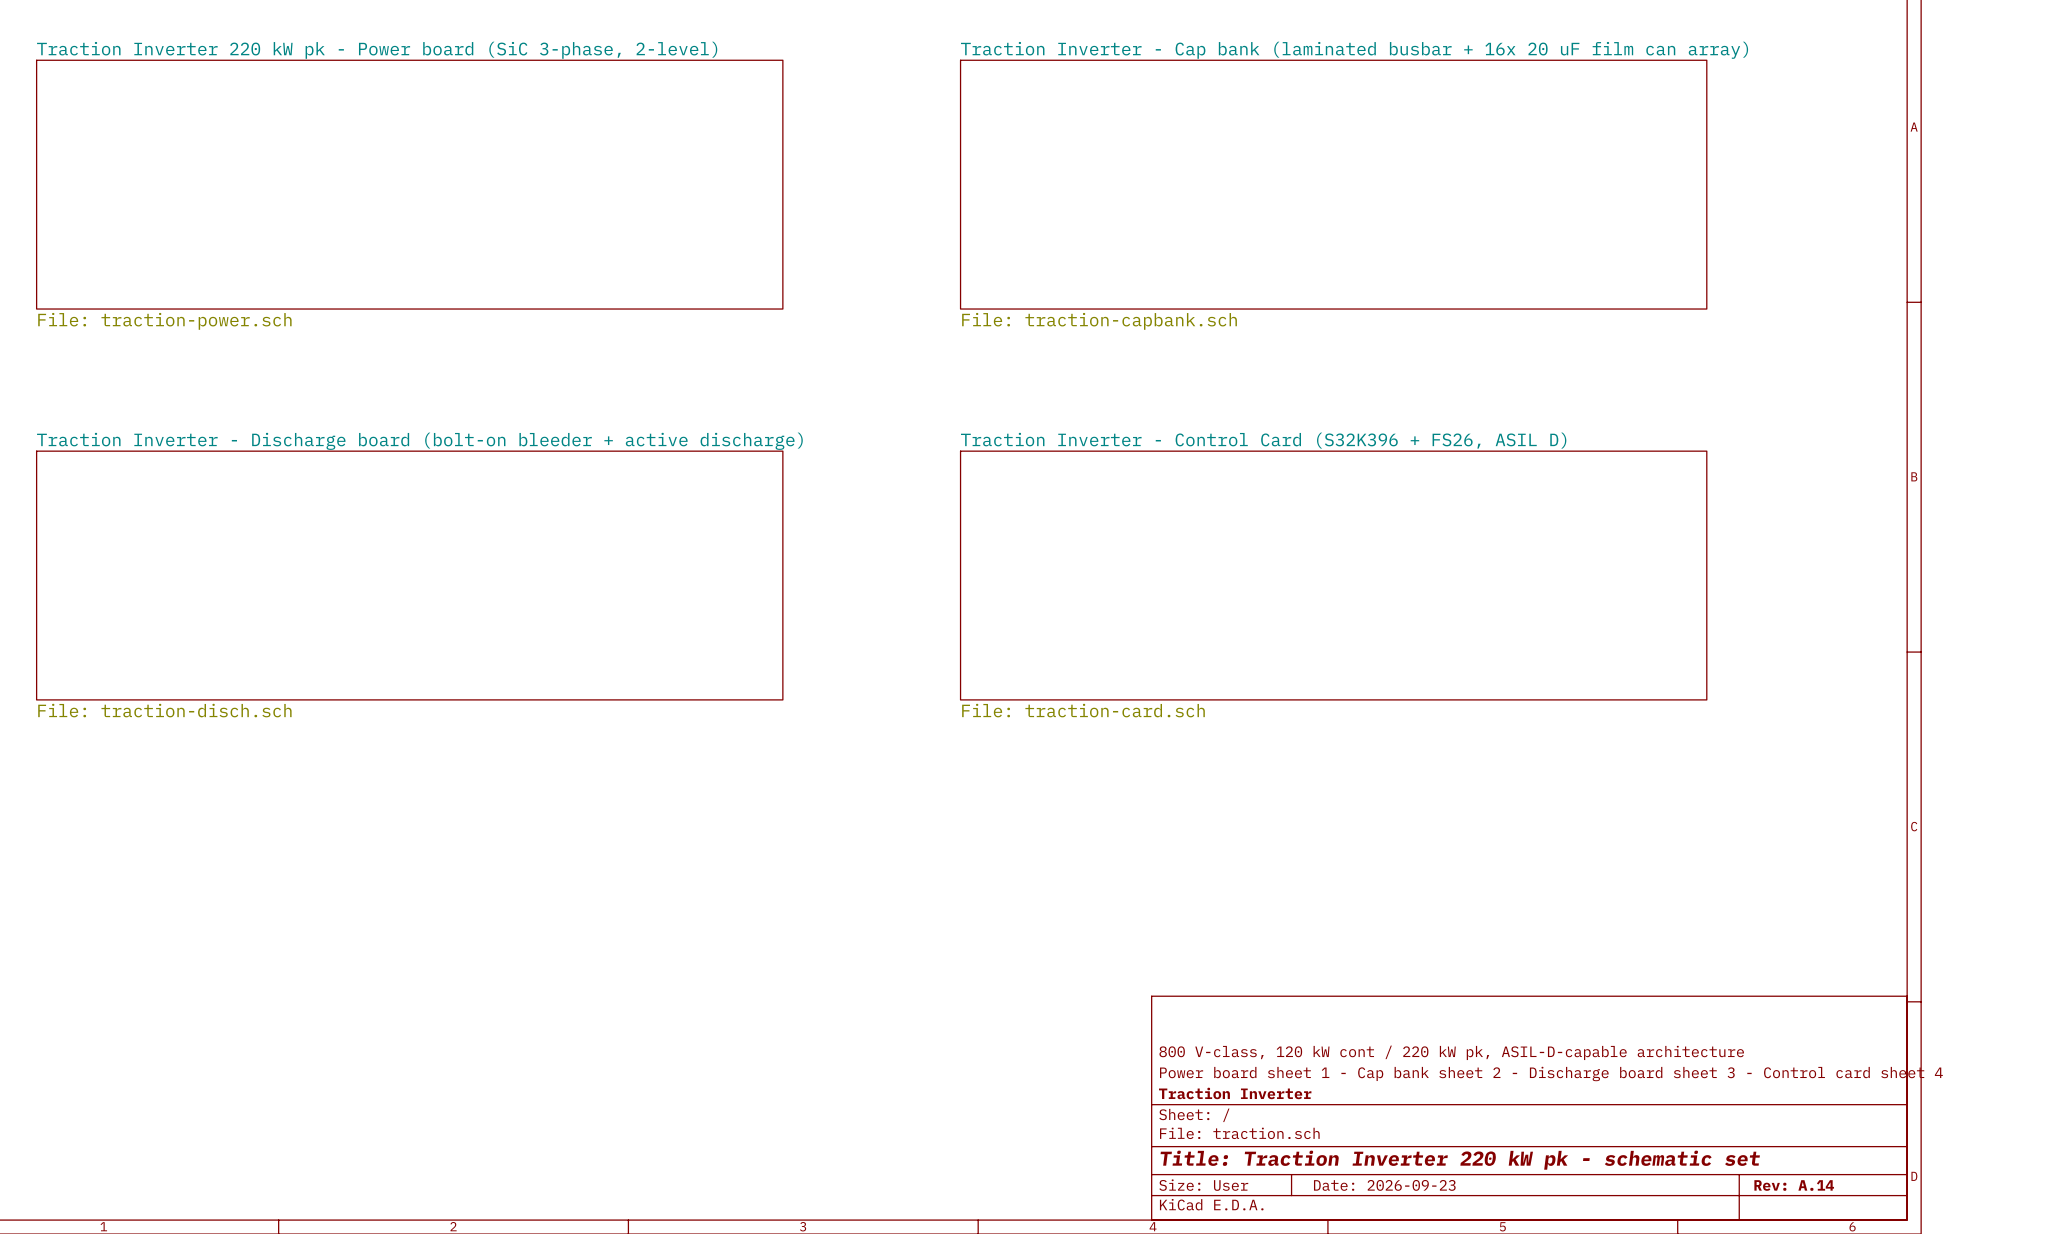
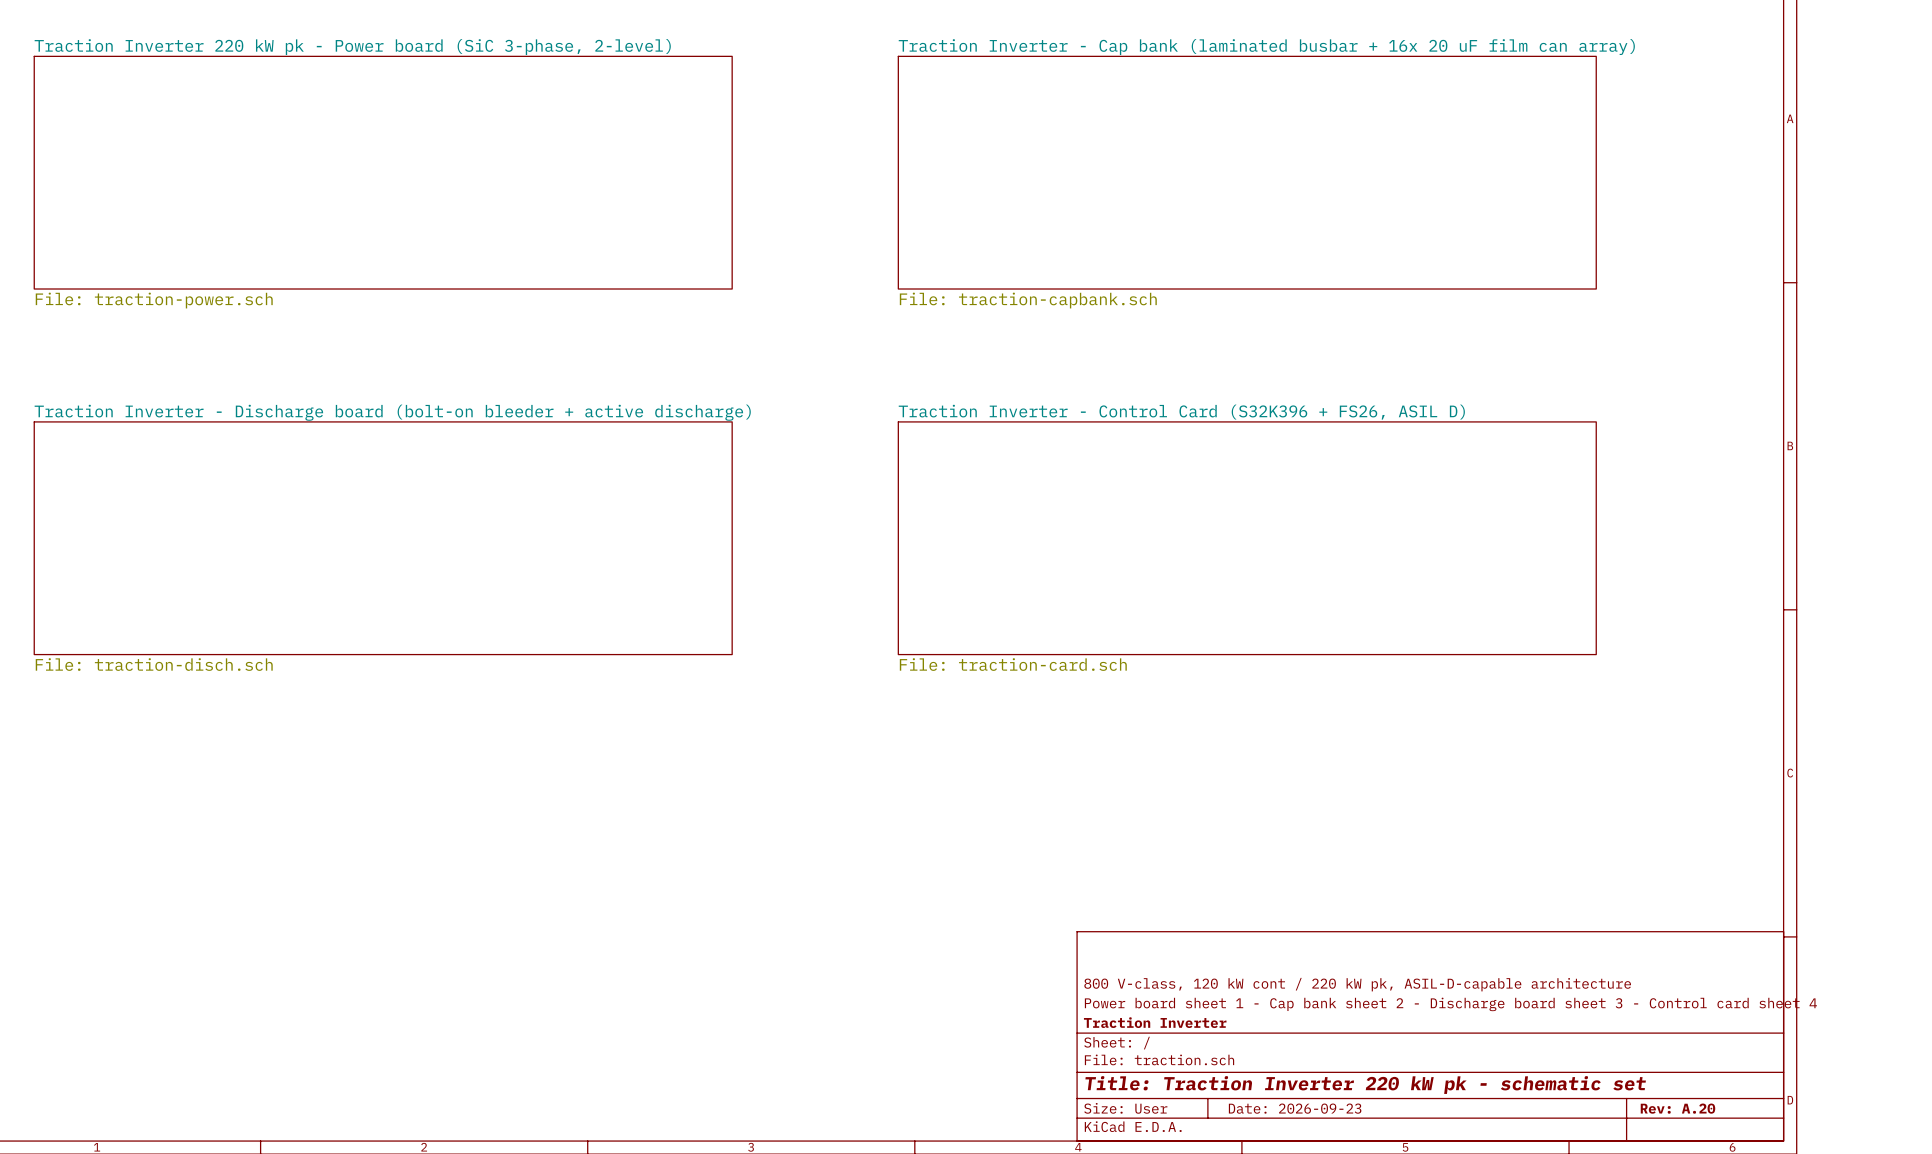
title block: Rev: A.14 (1794, 1185) -> Rev: A.20 (1677, 1108)

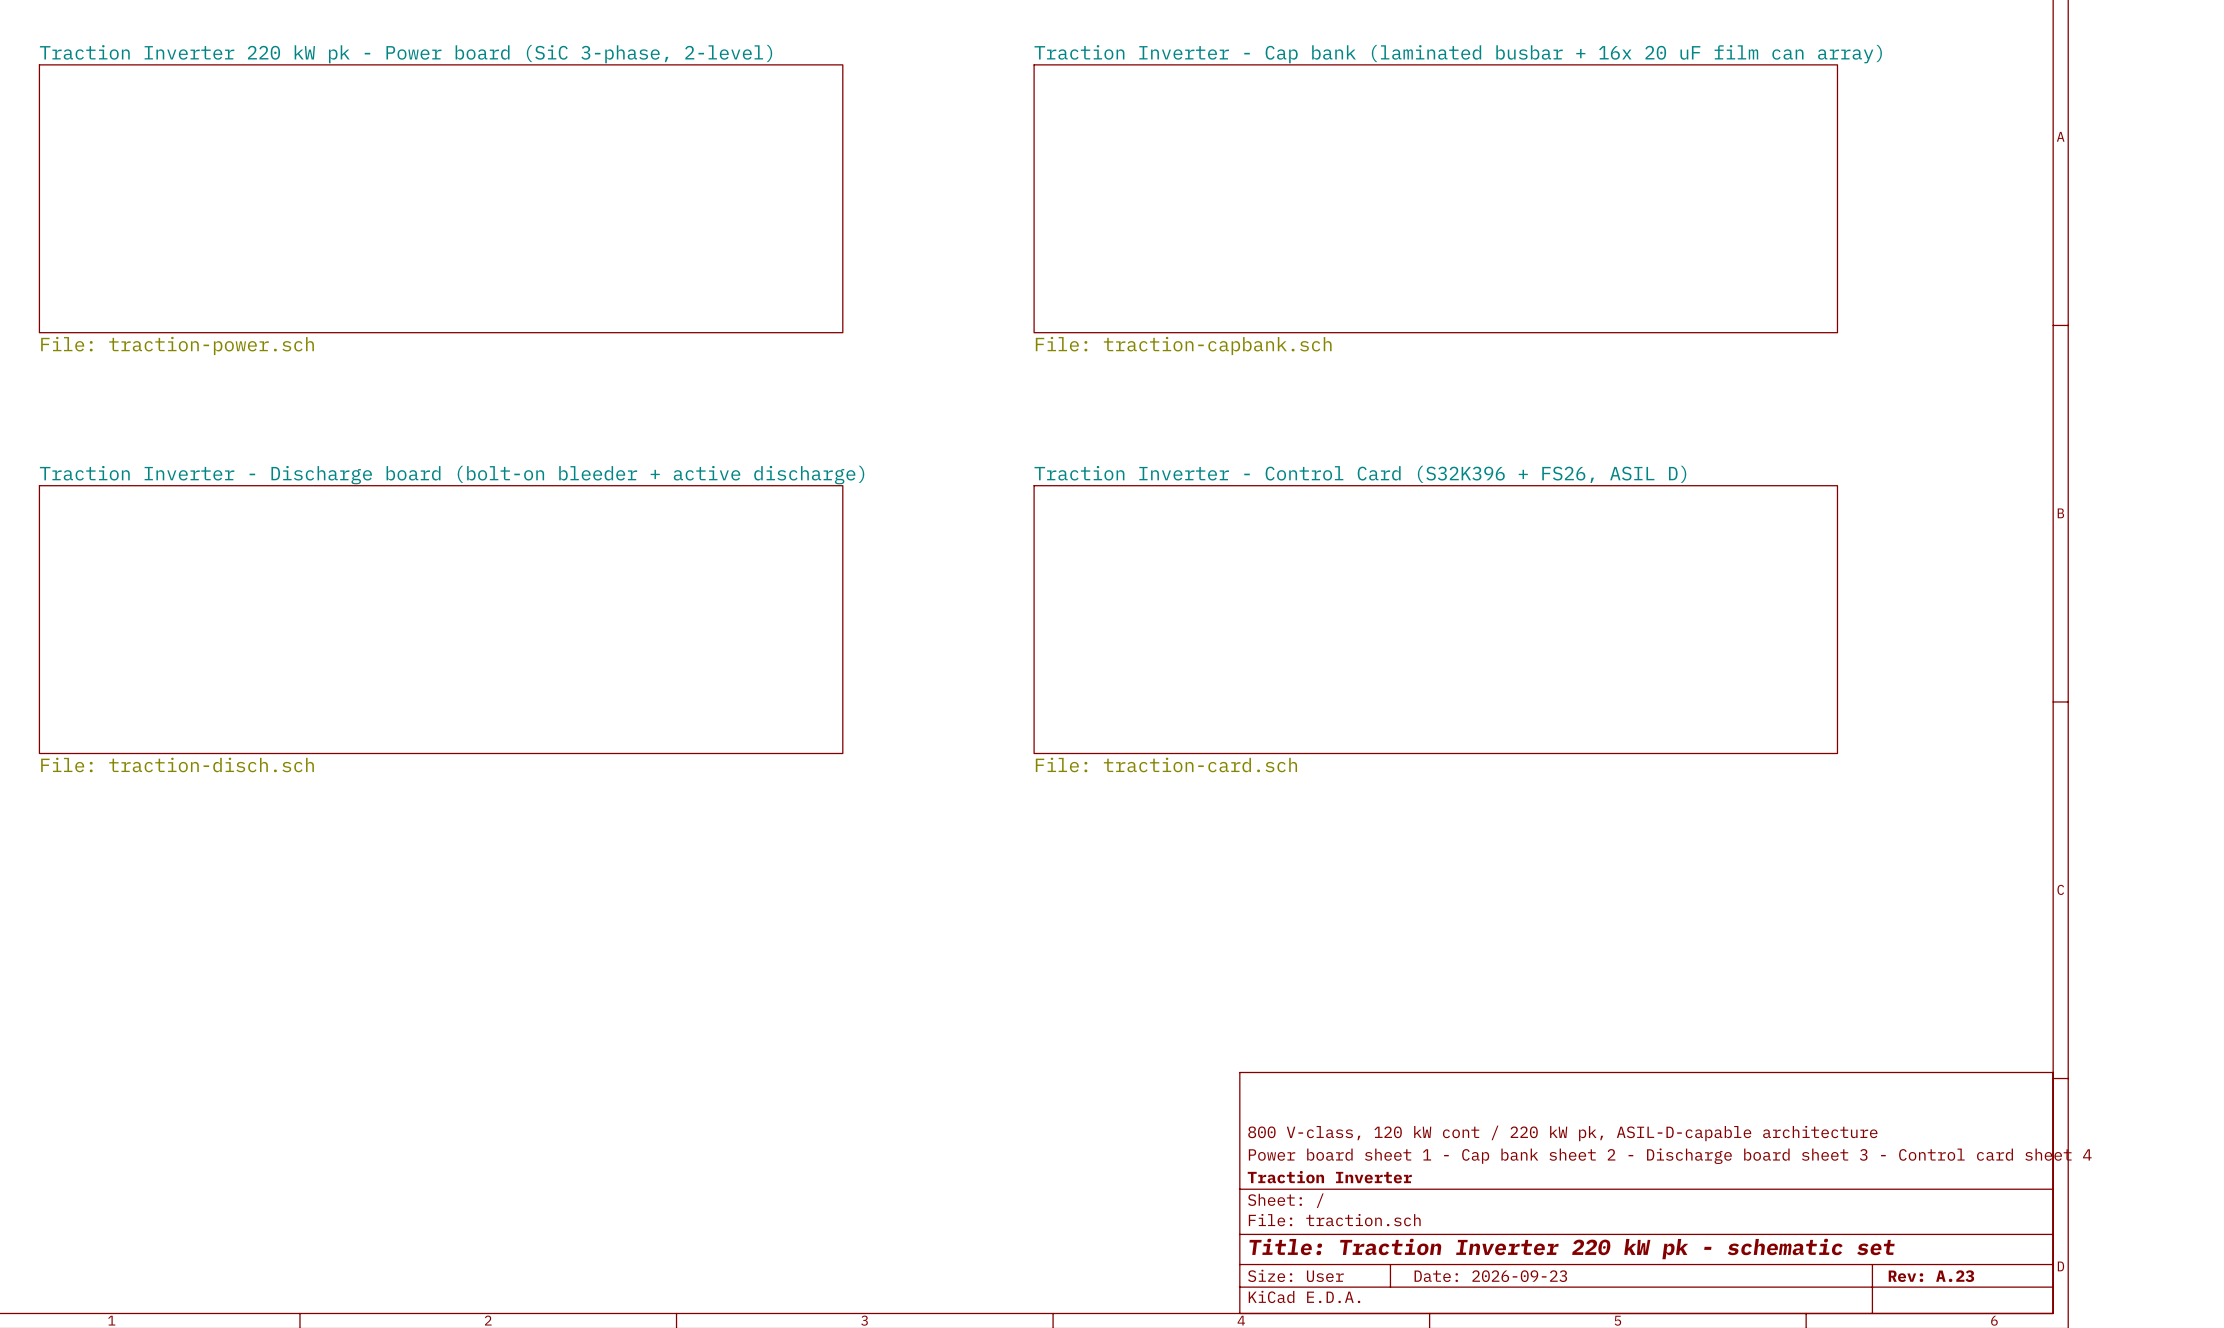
title block: Rev: A.20 (1677, 1108) -> Rev: A.23 (1931, 1276)

